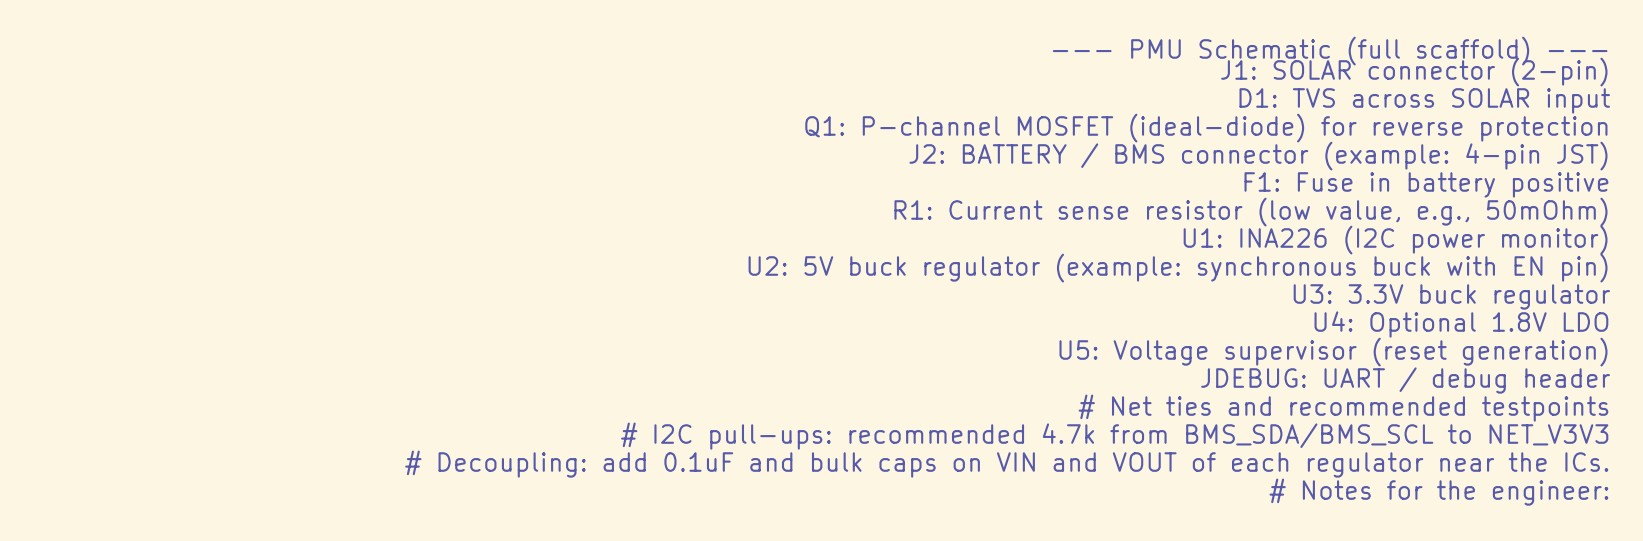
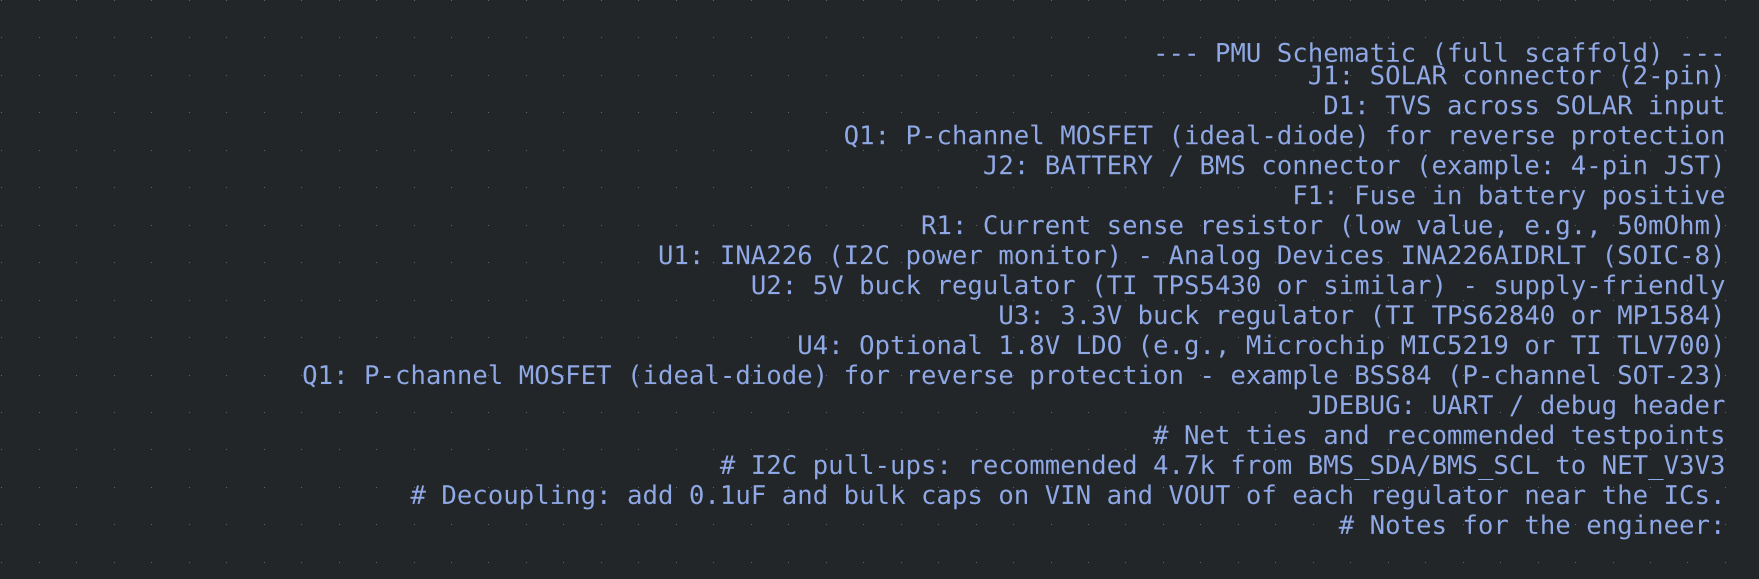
text: U1: INA226 (I2C power monitor) (1395, 240) -> U1: INA226 (I2C power monitor) - Analog Devices INA226AIDRLT (SOIC-8) (1189, 257)
text: U2: 5V buck regulator (example: synchronous buck with EN pin) (1178, 268) -> U2: 5V buck regulator (TI TPS5430 or similar) - supply-friendly (1238, 287)
text: U3: 3.3V buck regulator (1451, 296) -> U3: 3.3V buck regulator (TI TPS62840 or MP1584) (1360, 317)
text: U4: Optional 1.8V LDO (1461, 324) -> U4: Optional 1.8V LDO (e.g., Microchip MIC5219 or TI TLV700) (1259, 346)
text: U5: Voltage supervisor (reset generation) (1333, 352) -> Q1: P-channel MOSFET (ideal-diode) for reverse protection - example BSS84 (P-channel SOT-23) (1011, 376)

